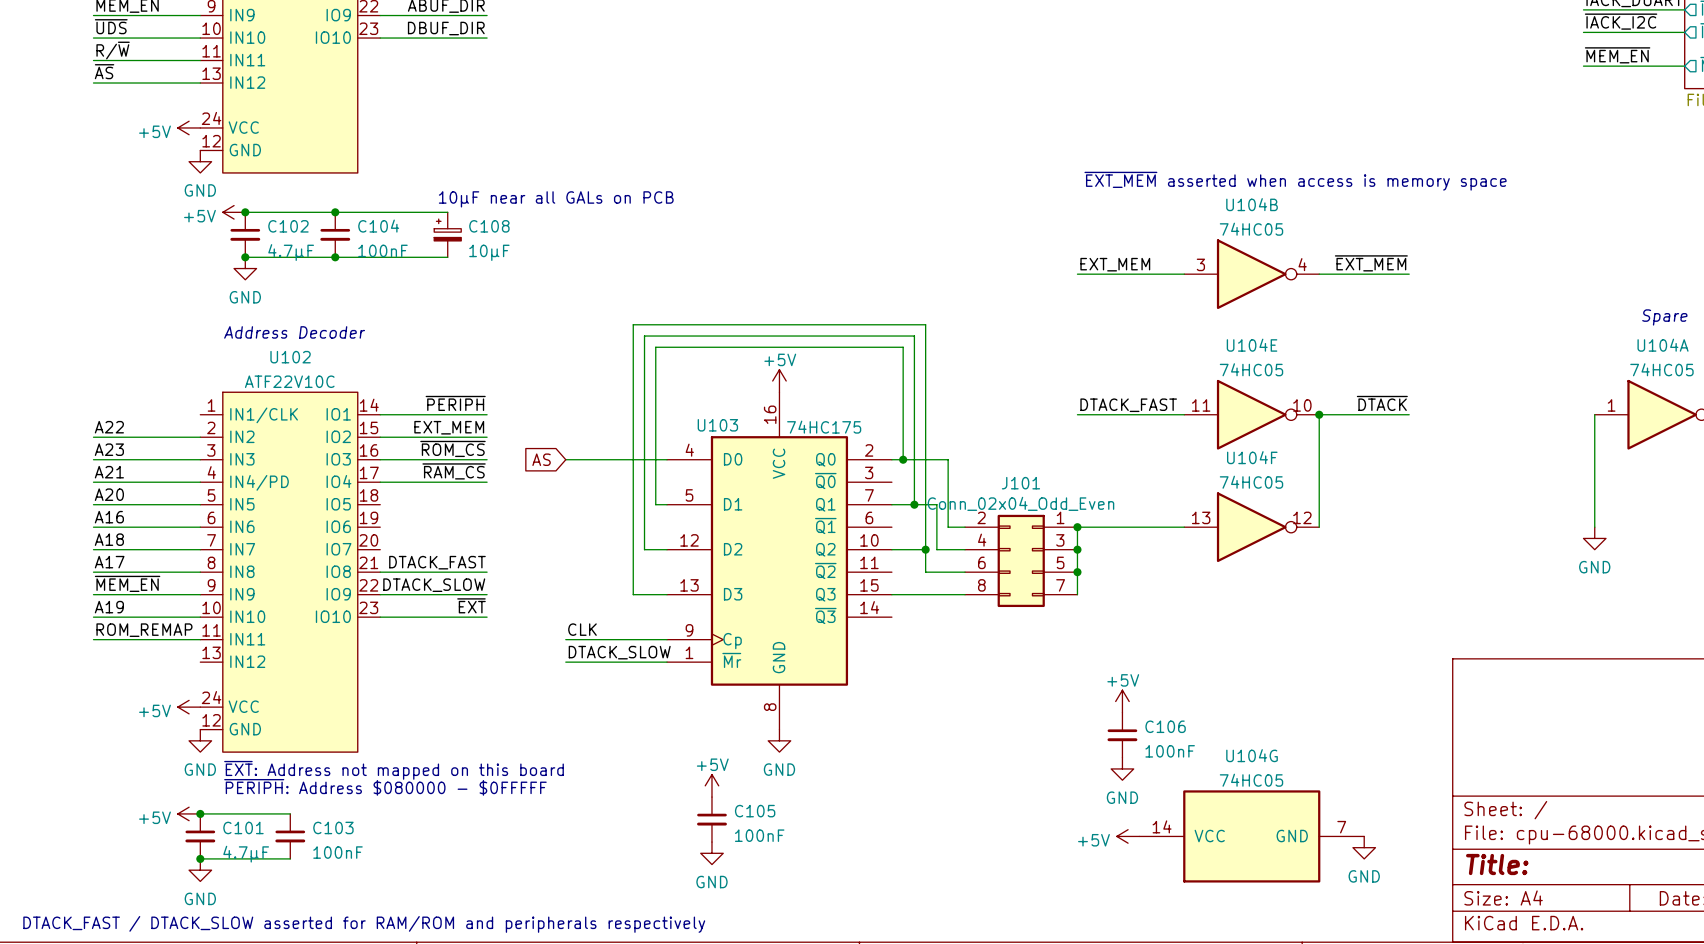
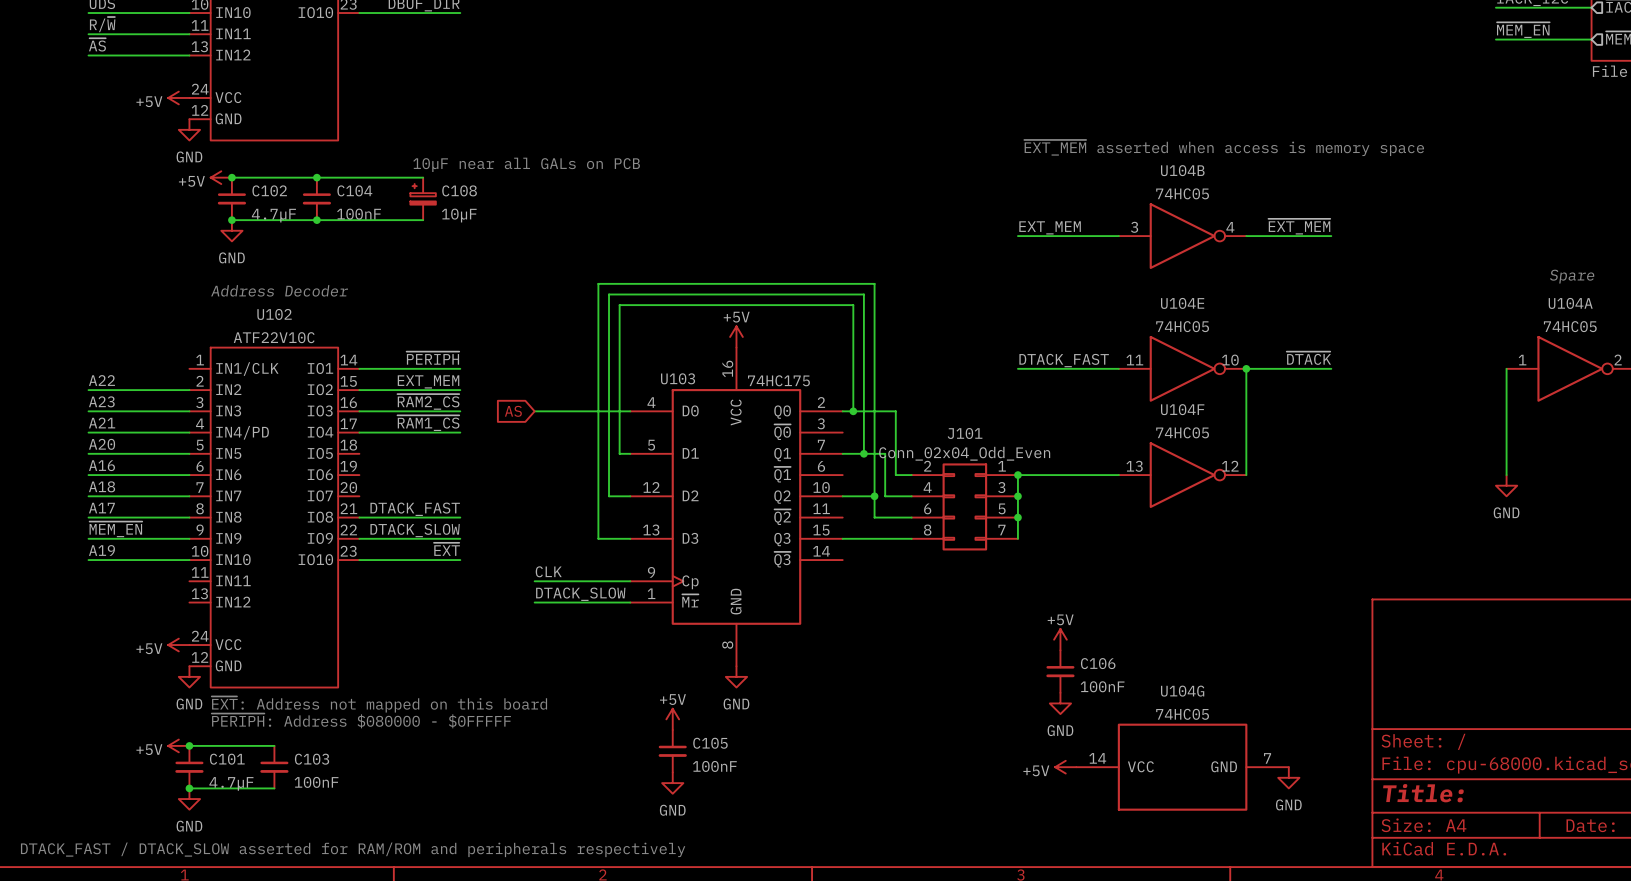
label: ~{ROM_CS} (452, 448) -> ~{RAM2_CS} (428, 401)
label: ~{RAM_CS} (454, 471) -> ~{RAM1_CS} (428, 423)
label: ROM_REMAP (144, 630) -> none
wire: (93, 639) (200, 639) -> none

